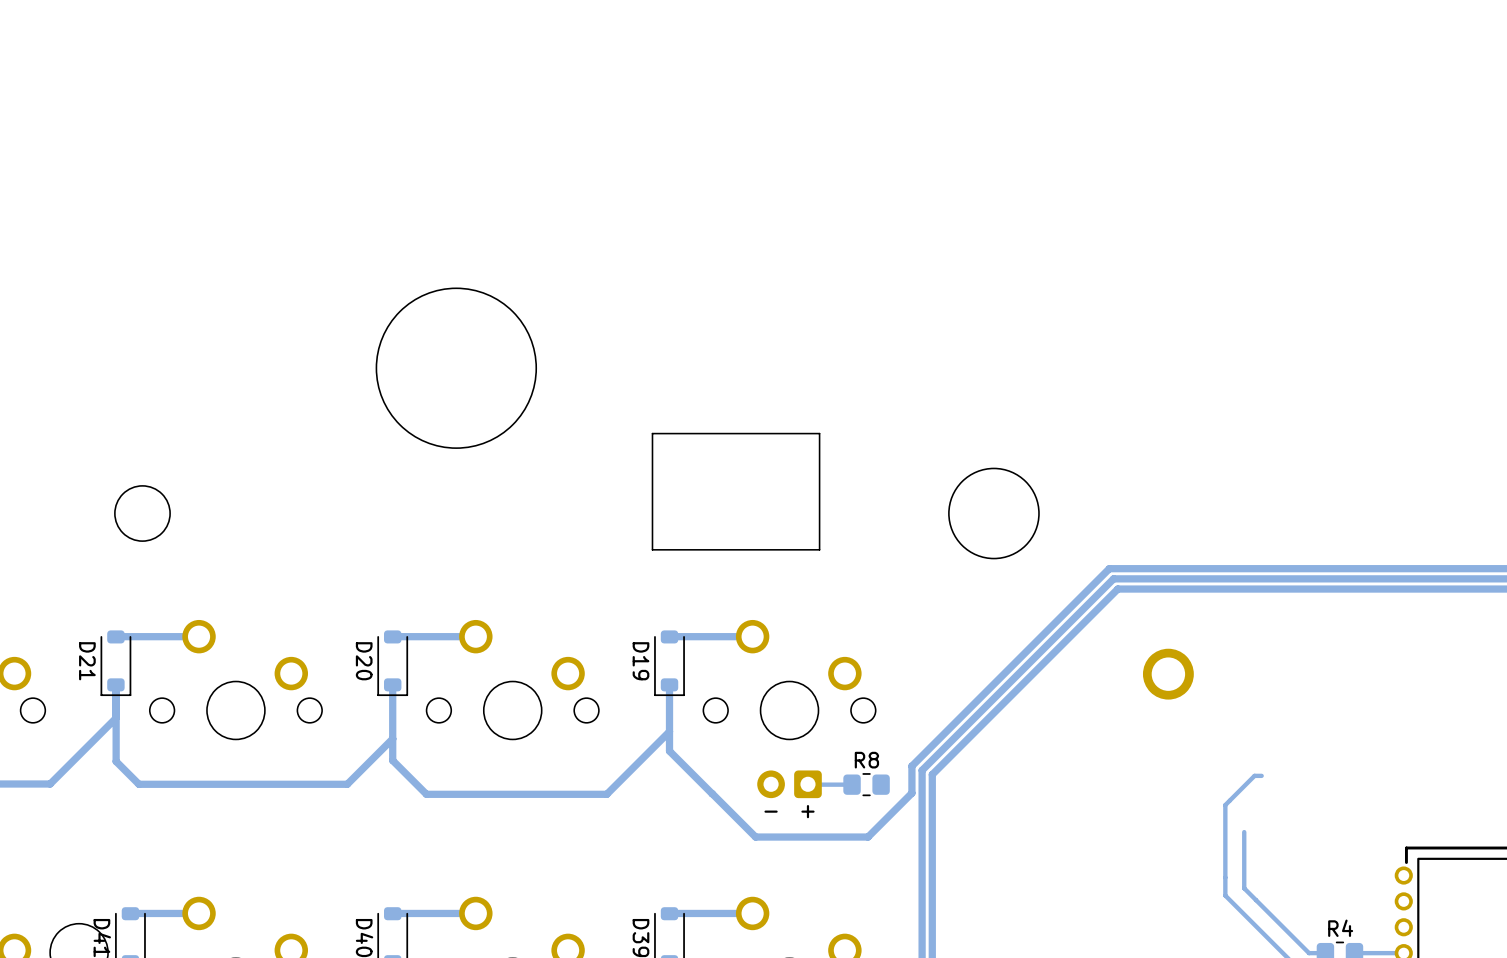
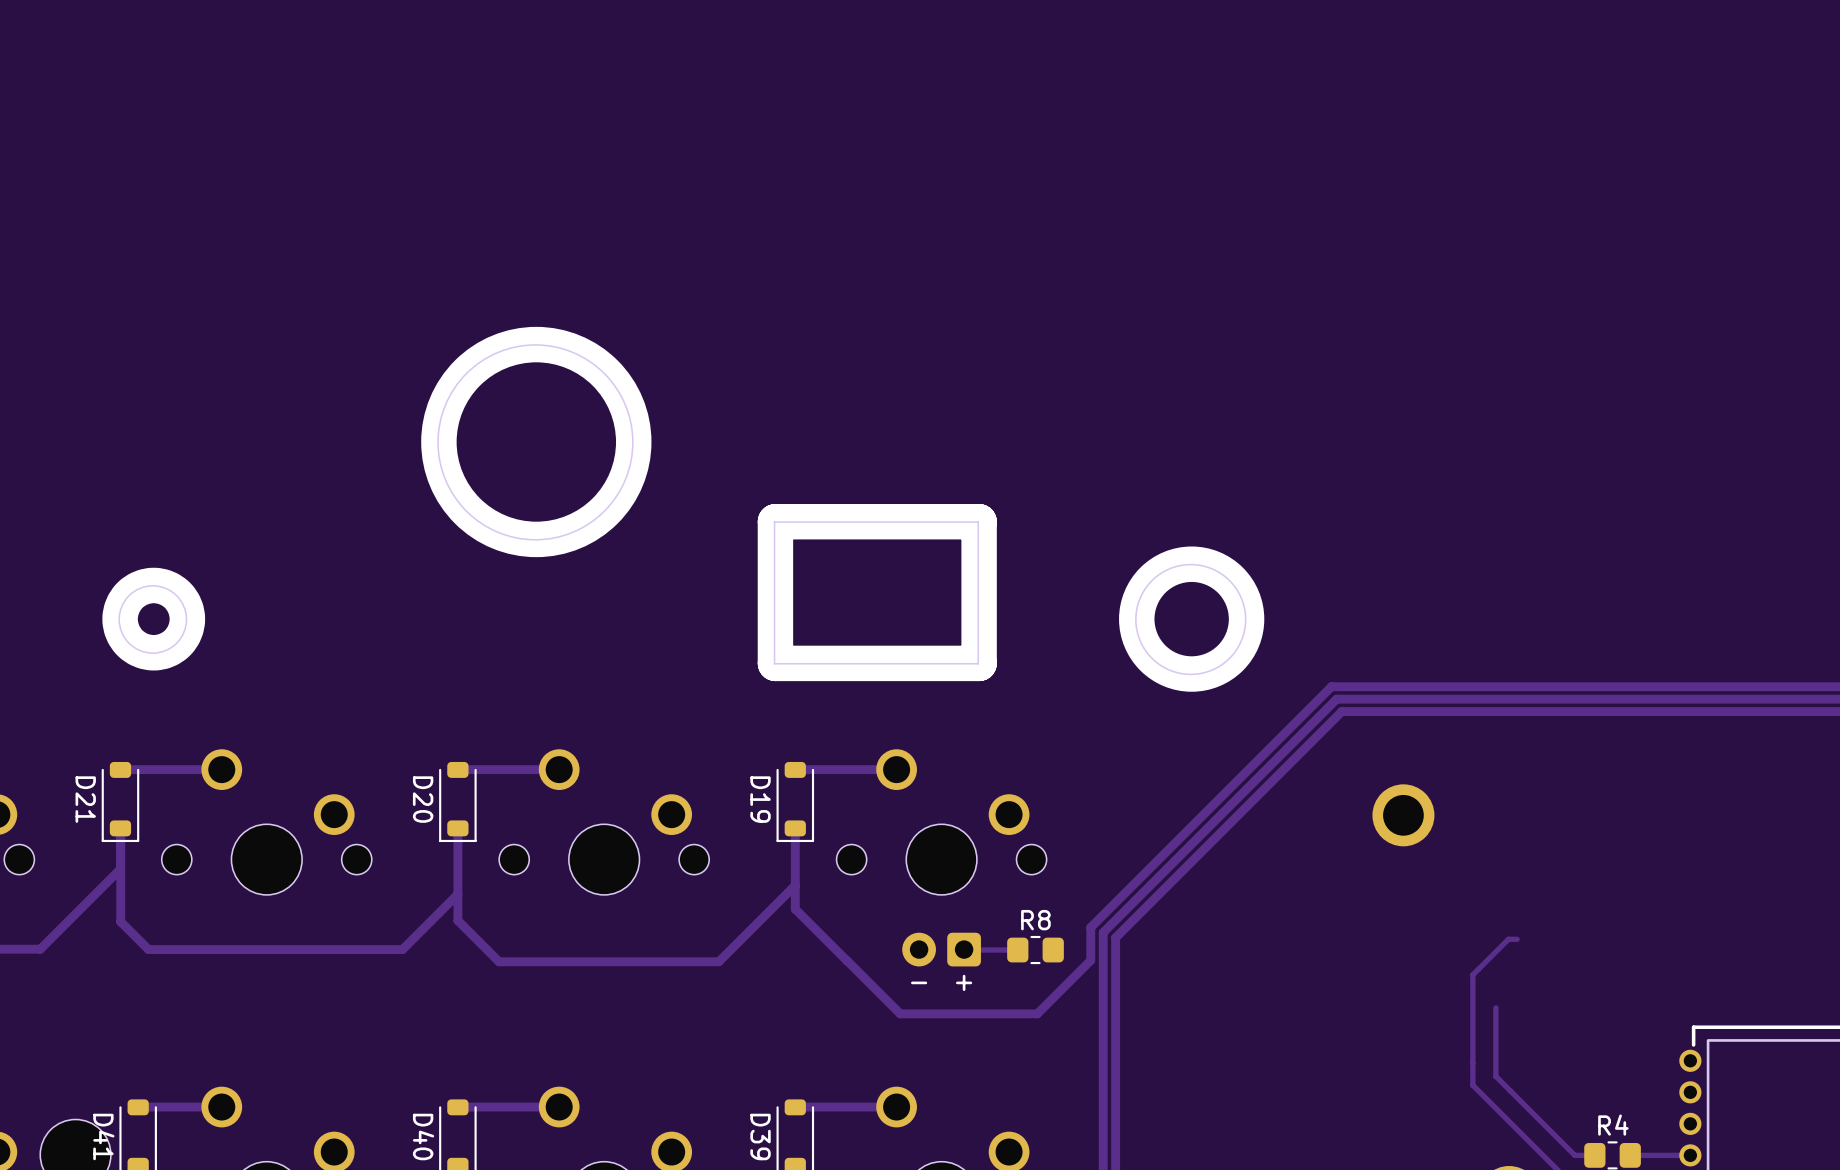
drawing: none -> [421, 326, 652, 558]
line: none -> (979, 521) (979, 663) (775, 663) (775, 521) (979, 521)
drawing: none -> [1119, 546, 1265, 692]
drawing: none -> [102, 567, 206, 671]

